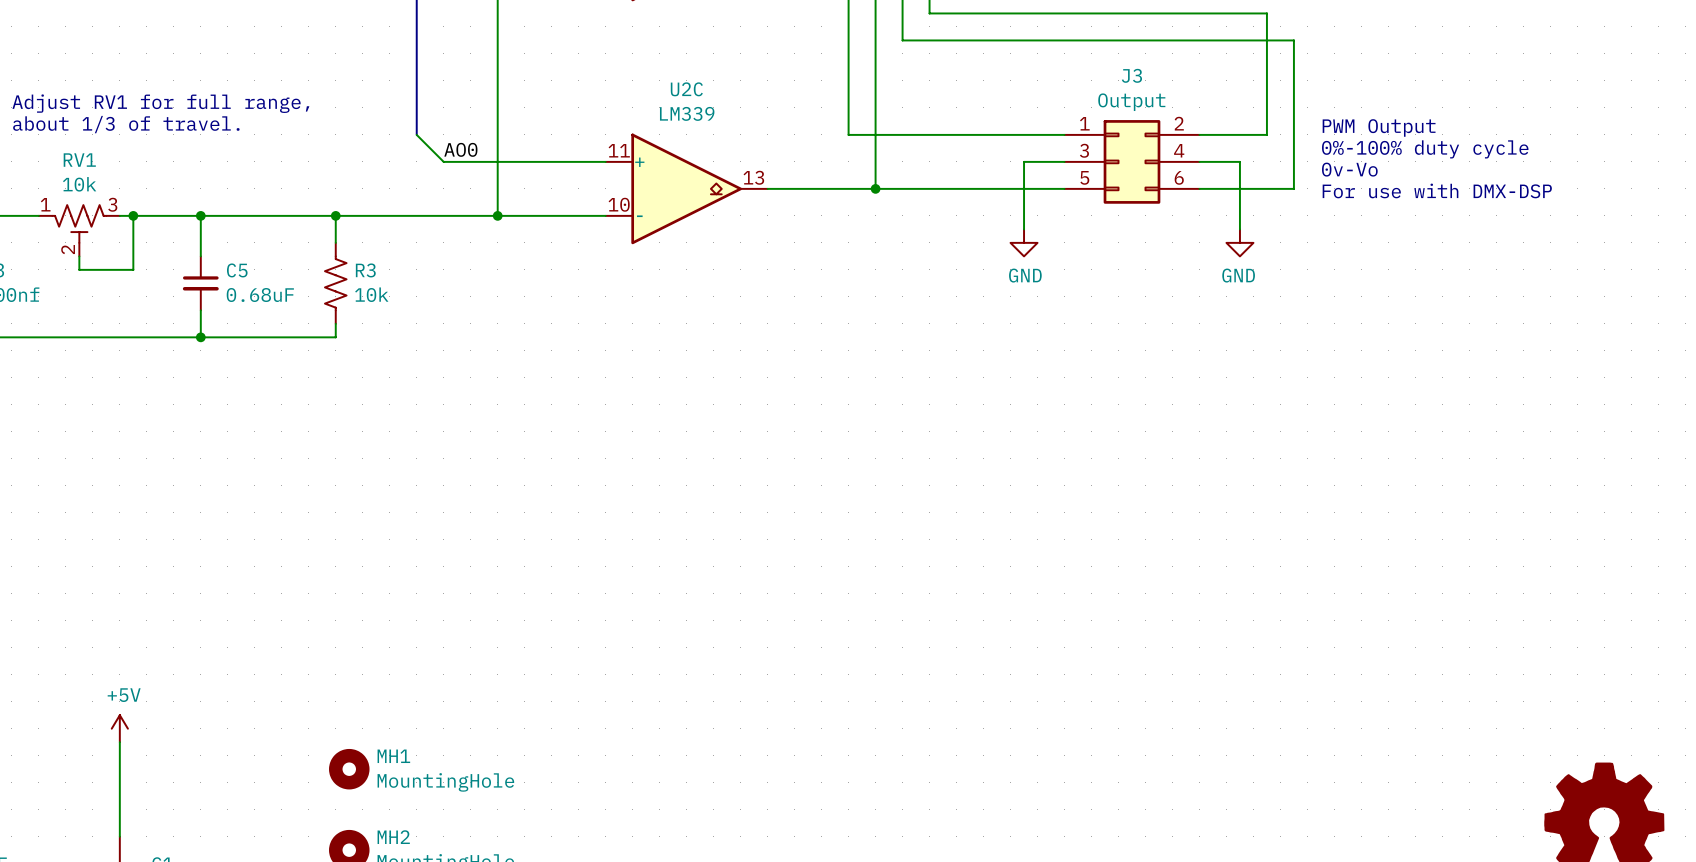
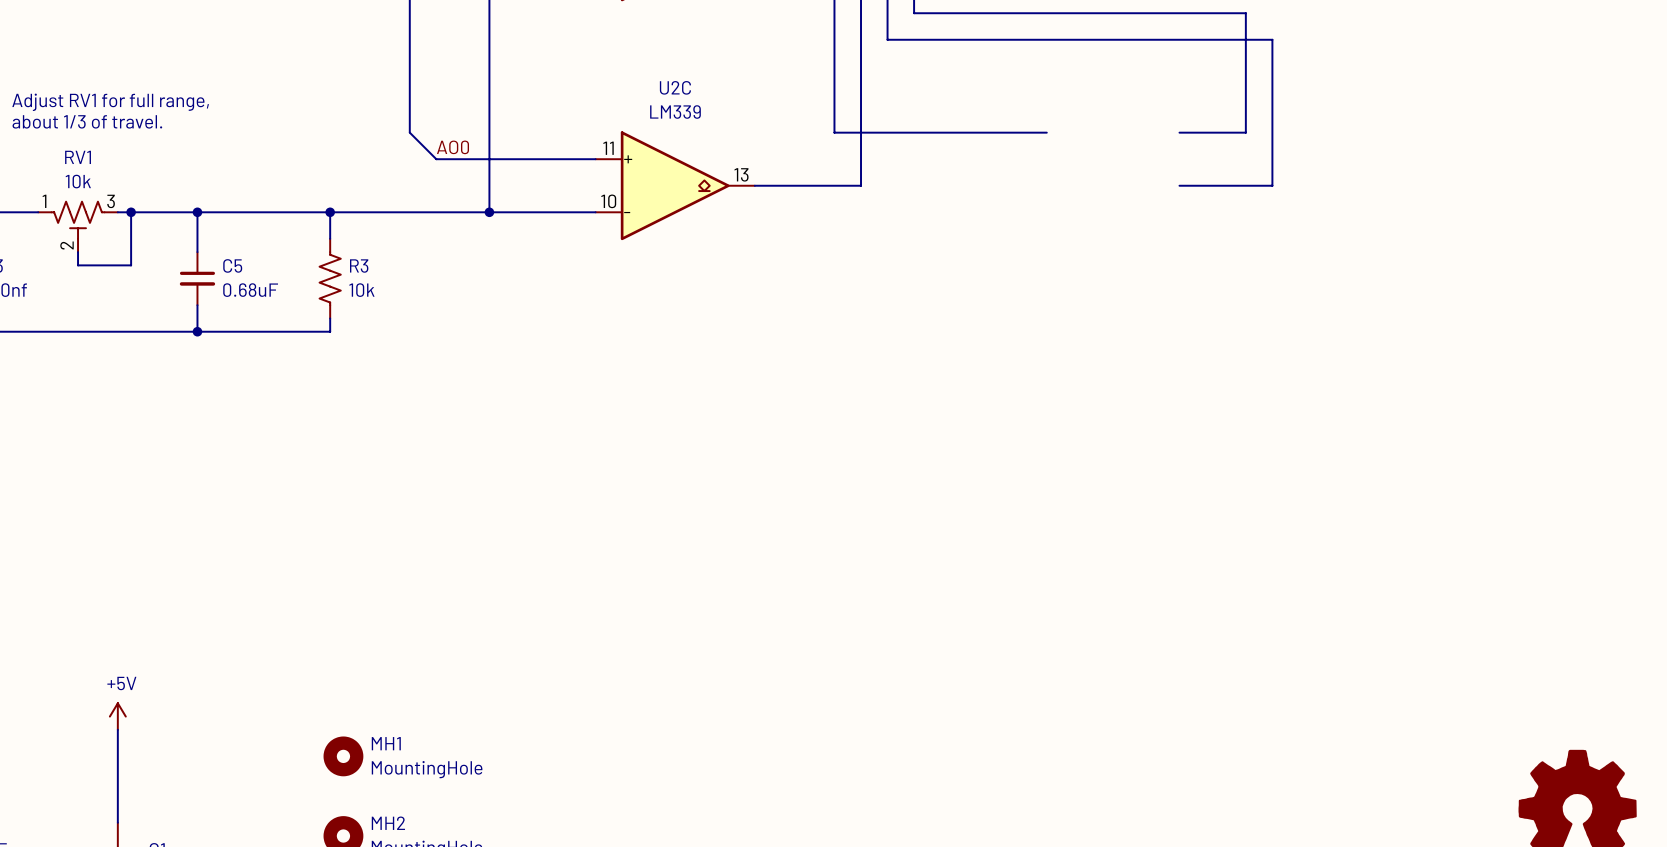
text: PWM Output (1379, 127) -> none
text: 0%-100% duty cycle (1425, 149) -> none
wire: (1064, 161) (1024, 161) (1024, 229) -> none
J3: Output (1132, 161) -> none
wire: (1199, 161) (1239, 161) (1239, 229) -> none
text: 0v-Vo (1349, 169) -> none
wire: (875, 188) (1064, 188) -> none
junction: (875, 188) -> none
text: For use with DMX-DSP (1437, 190) -> none
power symbol: GND (1024, 242) -> none
power symbol: GND (1239, 242) -> none

